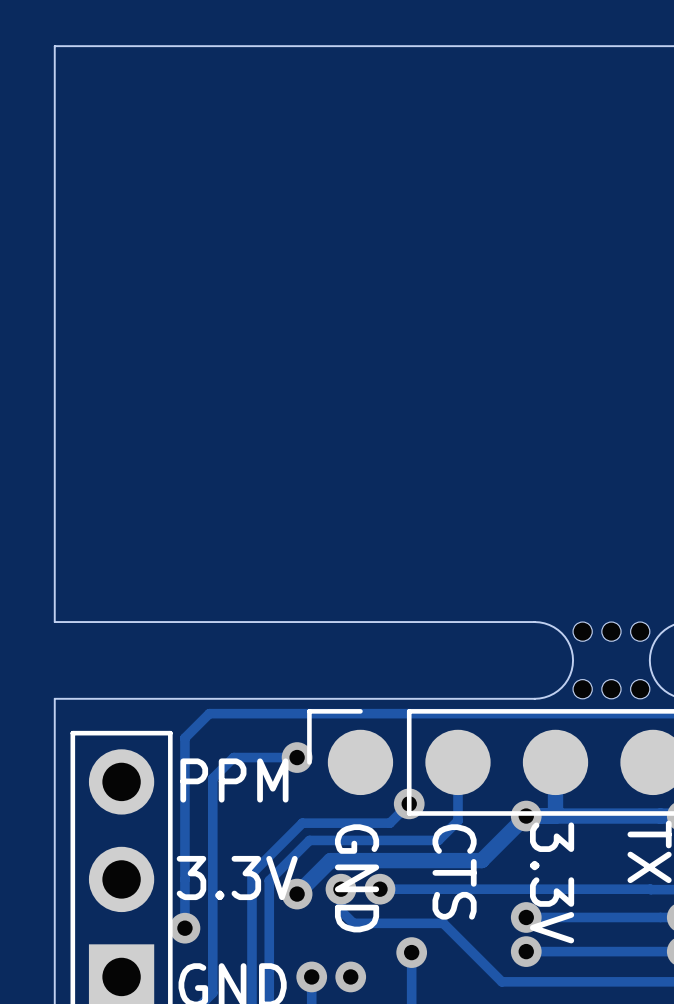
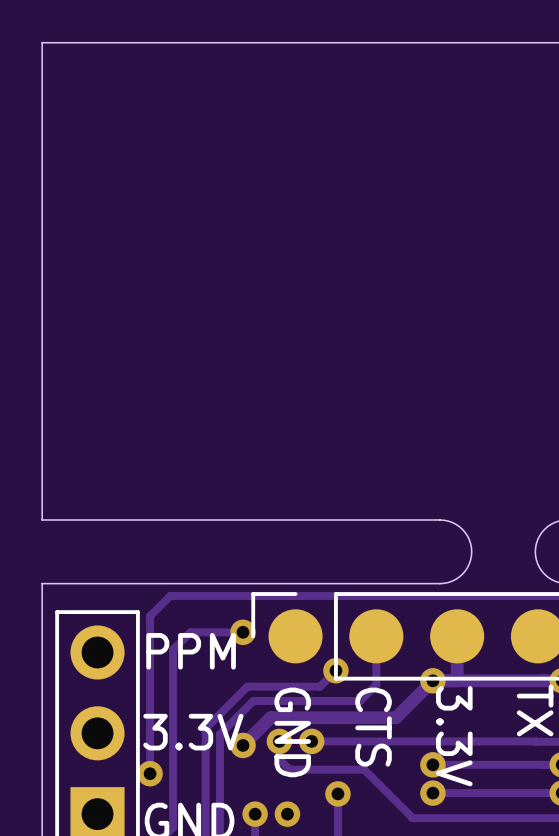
part: (611, 660) -> none

